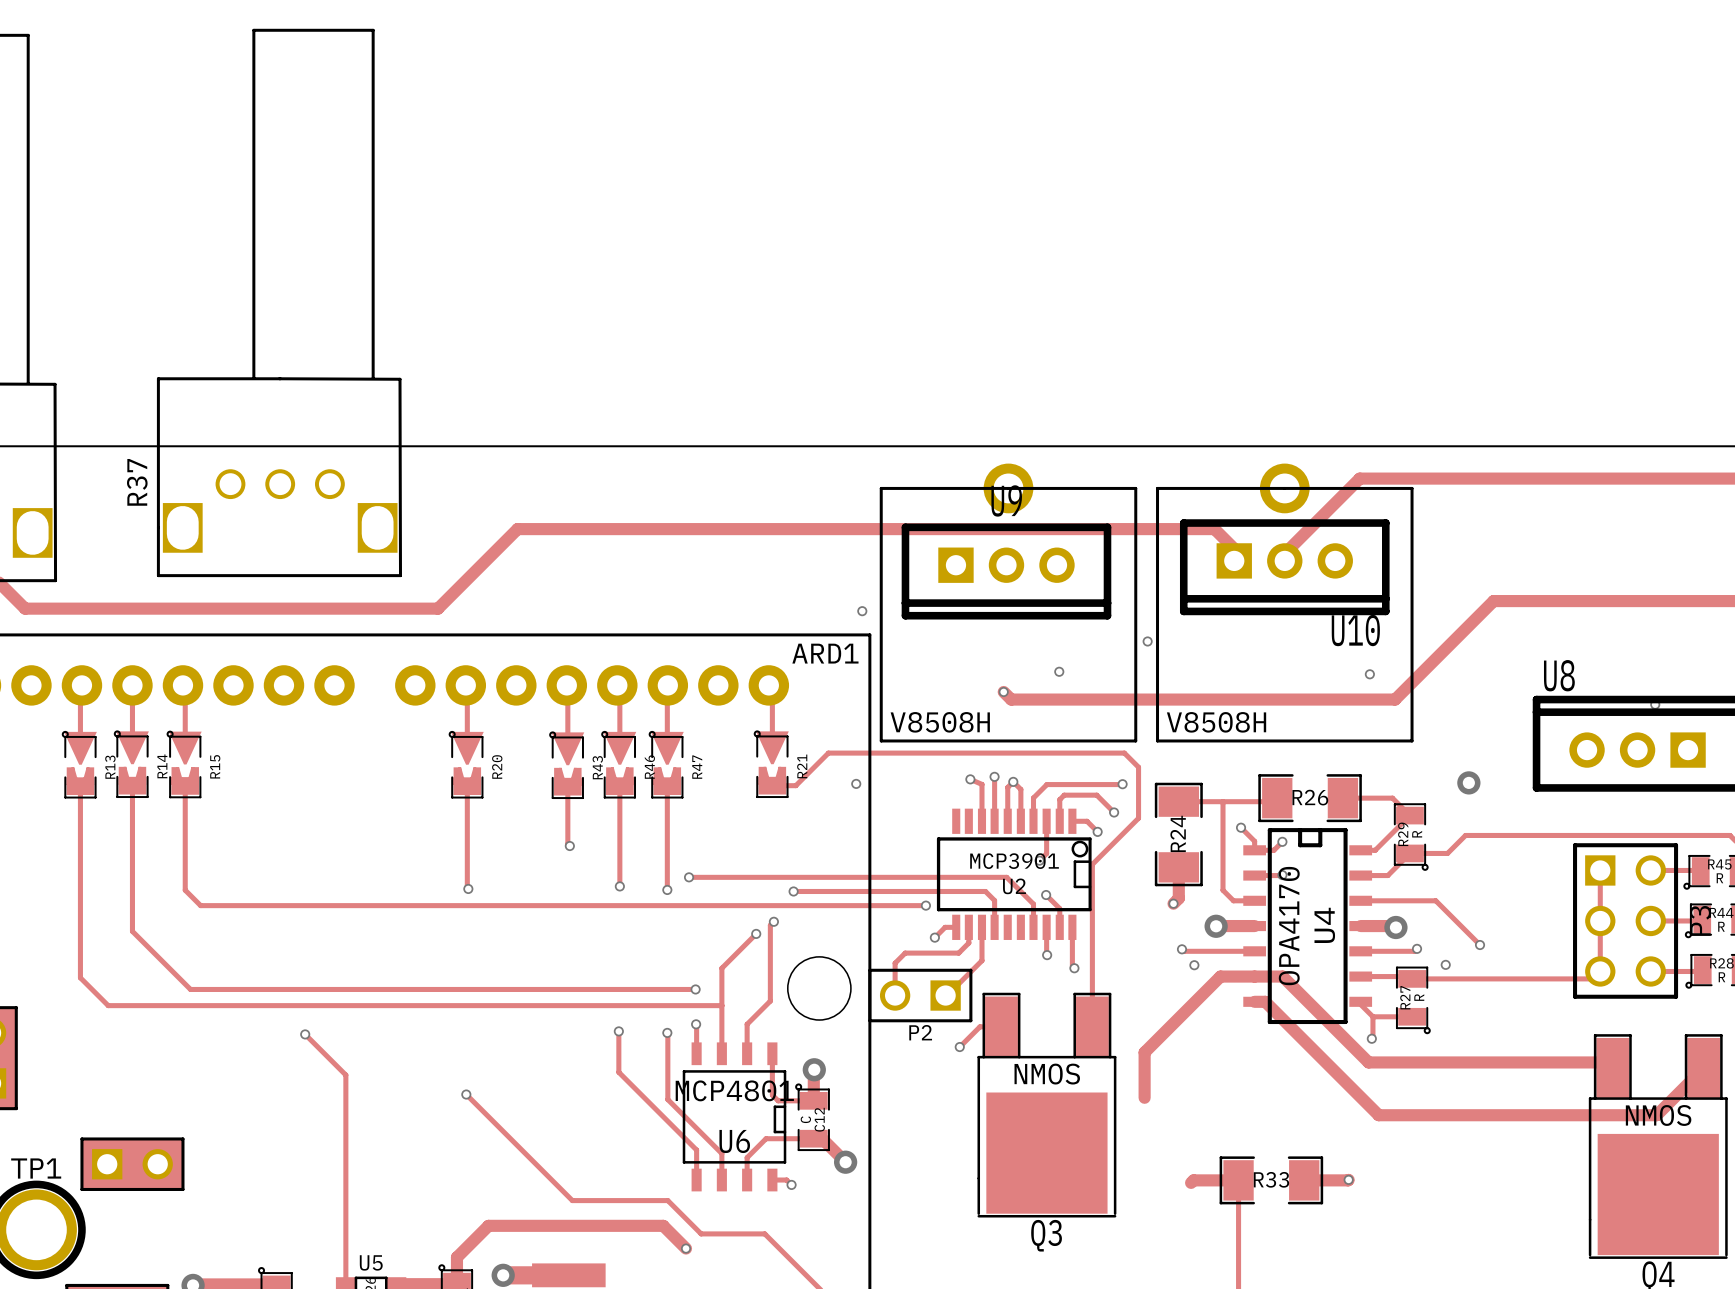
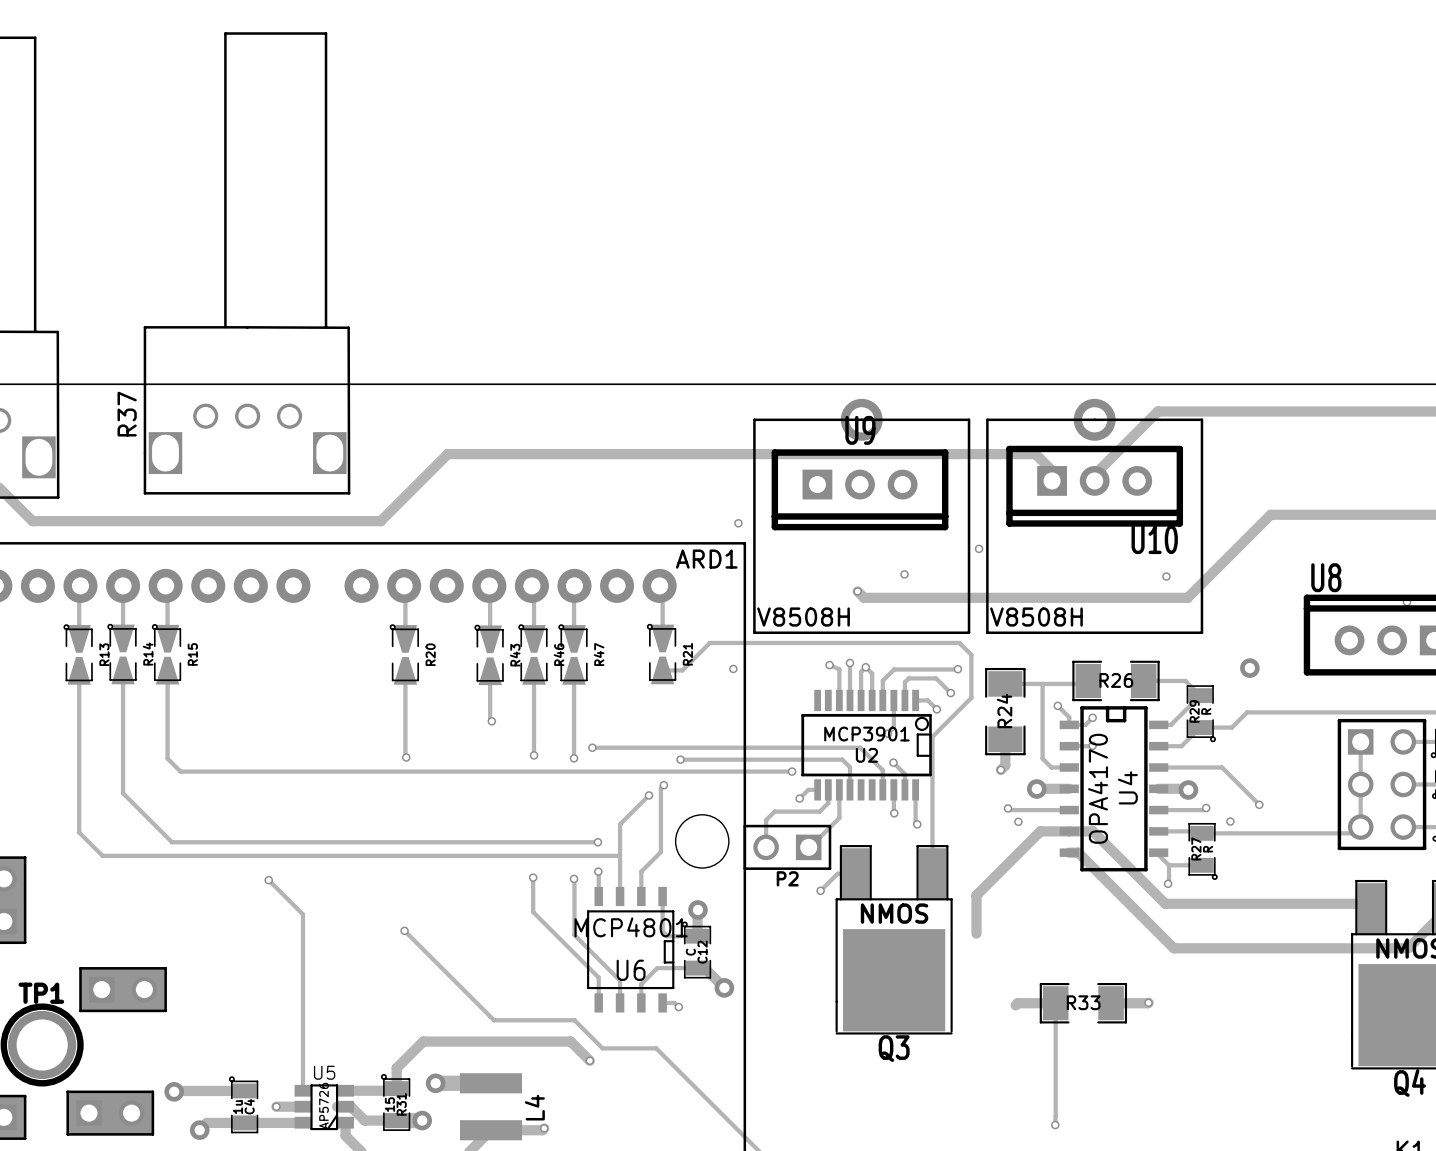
R13 footprint: [61, 730, 97, 799] -> [63, 624, 93, 685]
R14 footprint: [113, 730, 149, 799] -> [107, 623, 137, 685]
R15 footprint: [166, 730, 202, 799] -> [151, 624, 182, 685]
R20 footprint: [448, 730, 484, 799] -> [389, 624, 420, 685]
R46 footprint: [601, 730, 637, 799] -> [518, 624, 548, 685]
R47 footprint: [648, 730, 684, 799] -> [558, 624, 588, 685]
R21 footprint: [753, 730, 789, 799] -> [646, 623, 677, 685]
R43 footprint: [549, 731, 585, 800] -> [474, 624, 504, 686]

